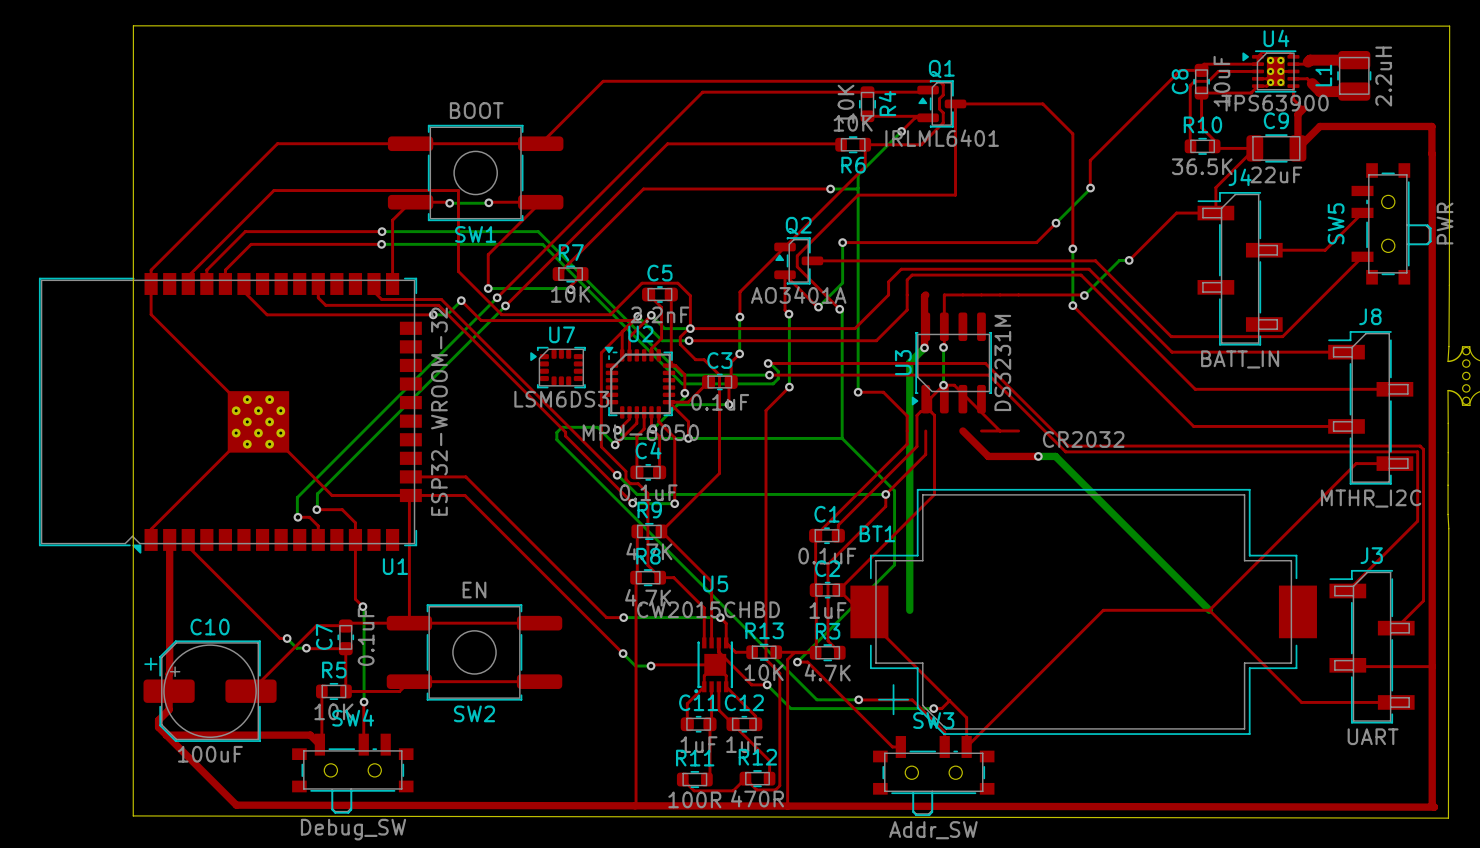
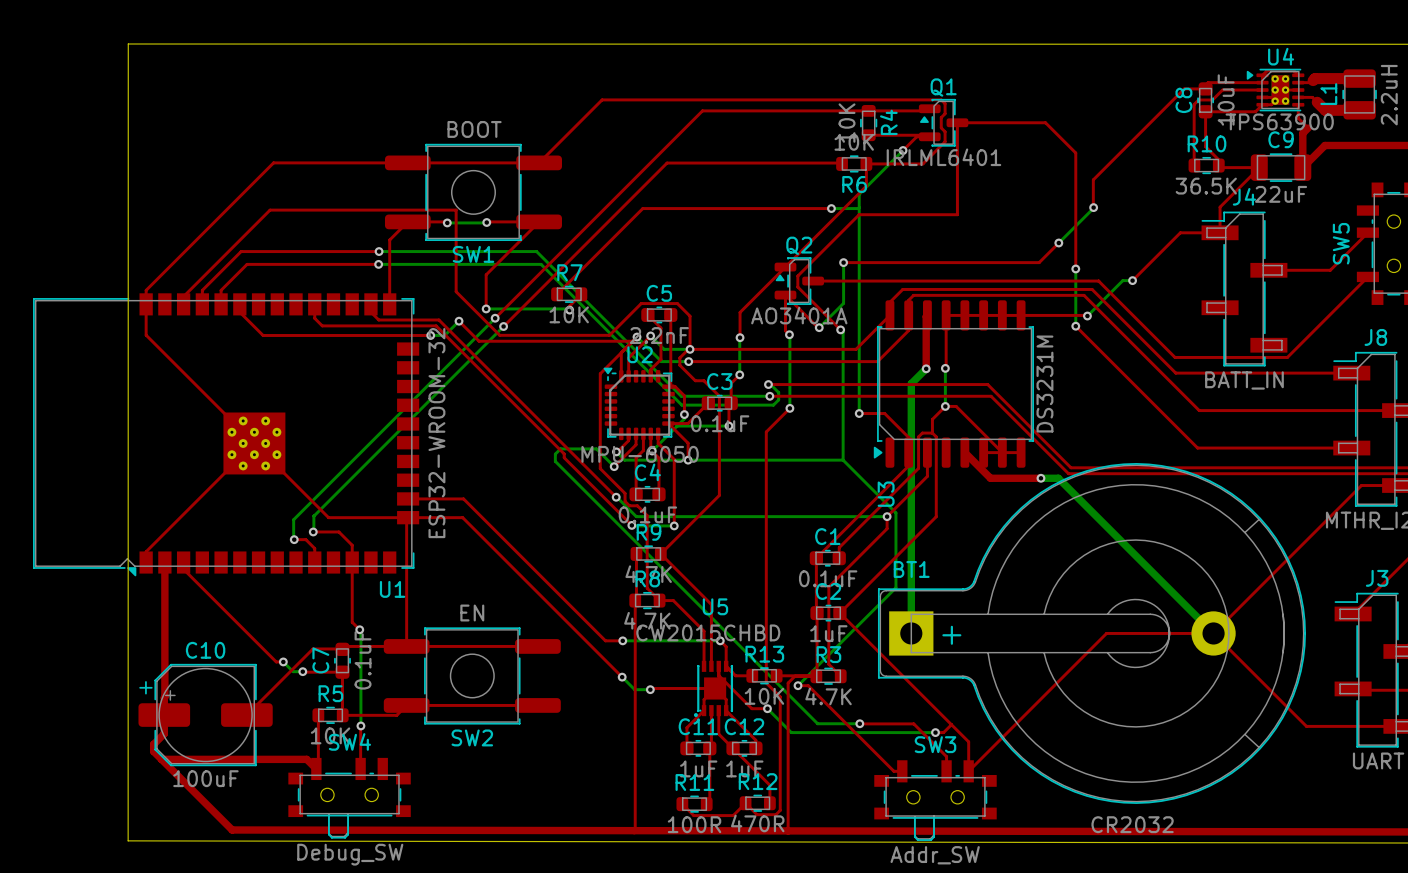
U3 footprint: [911, 312, 992, 414] -> [873, 300, 1035, 468]
U3 name position: U3 (903, 362) -> U3 (886, 494)
U3 value position: DS3231M (1002, 362) -> DS3231M (1044, 384)
U7: LSM6DS3 (558, 367) -> none
BT1 value position: CR2032 (1083, 439) -> CR2032 (1132, 824)
BT1 footprint: [850, 488, 1317, 735] -> [877, 463, 1306, 804]
BT1 name position: BT1 (877, 533) -> BT1 (911, 569)

